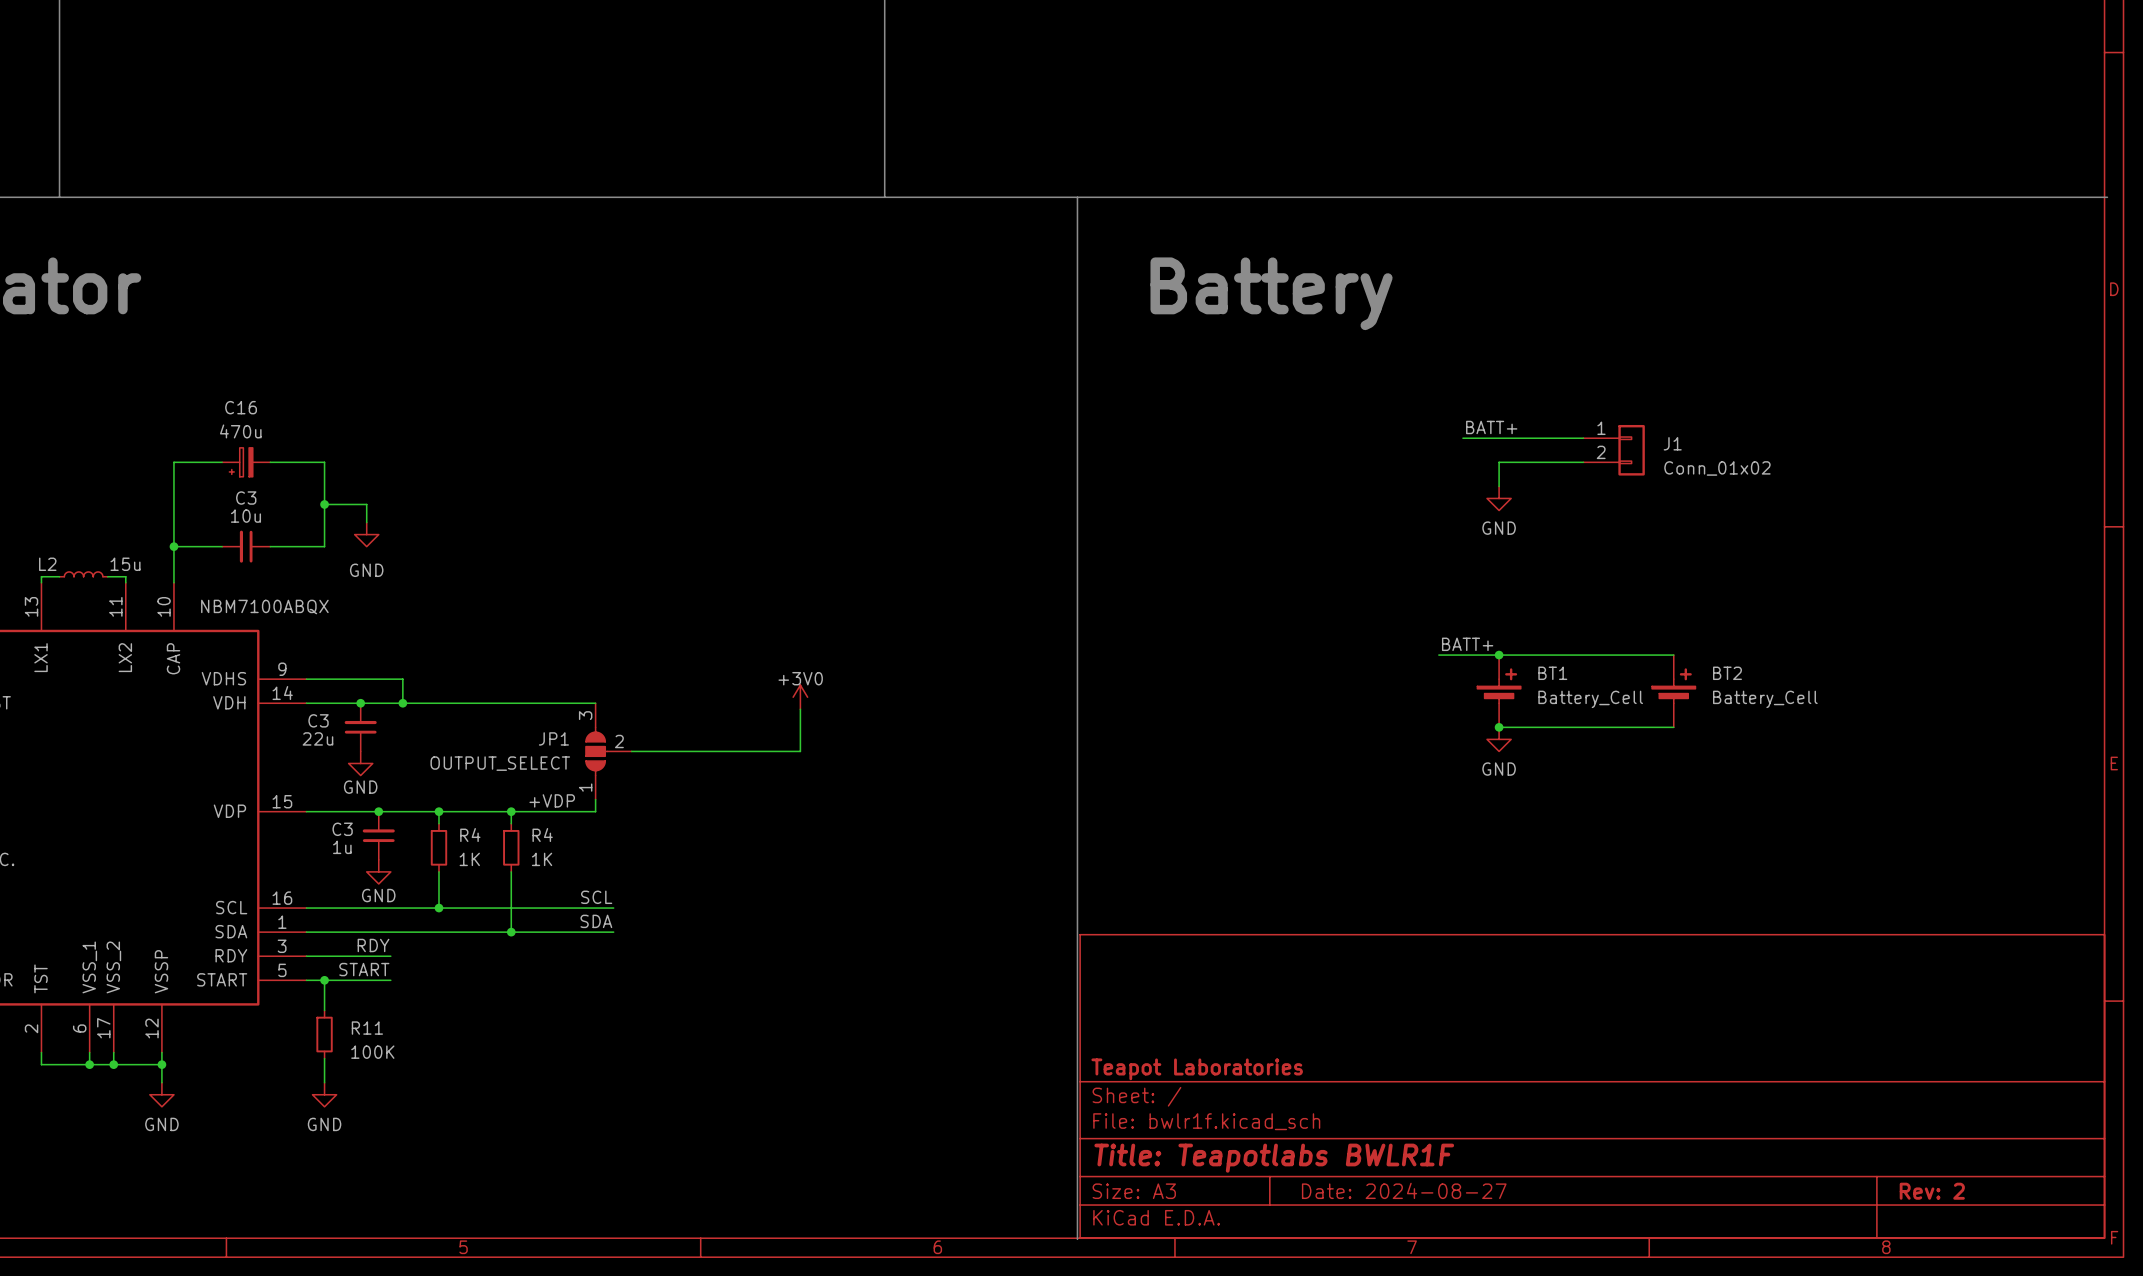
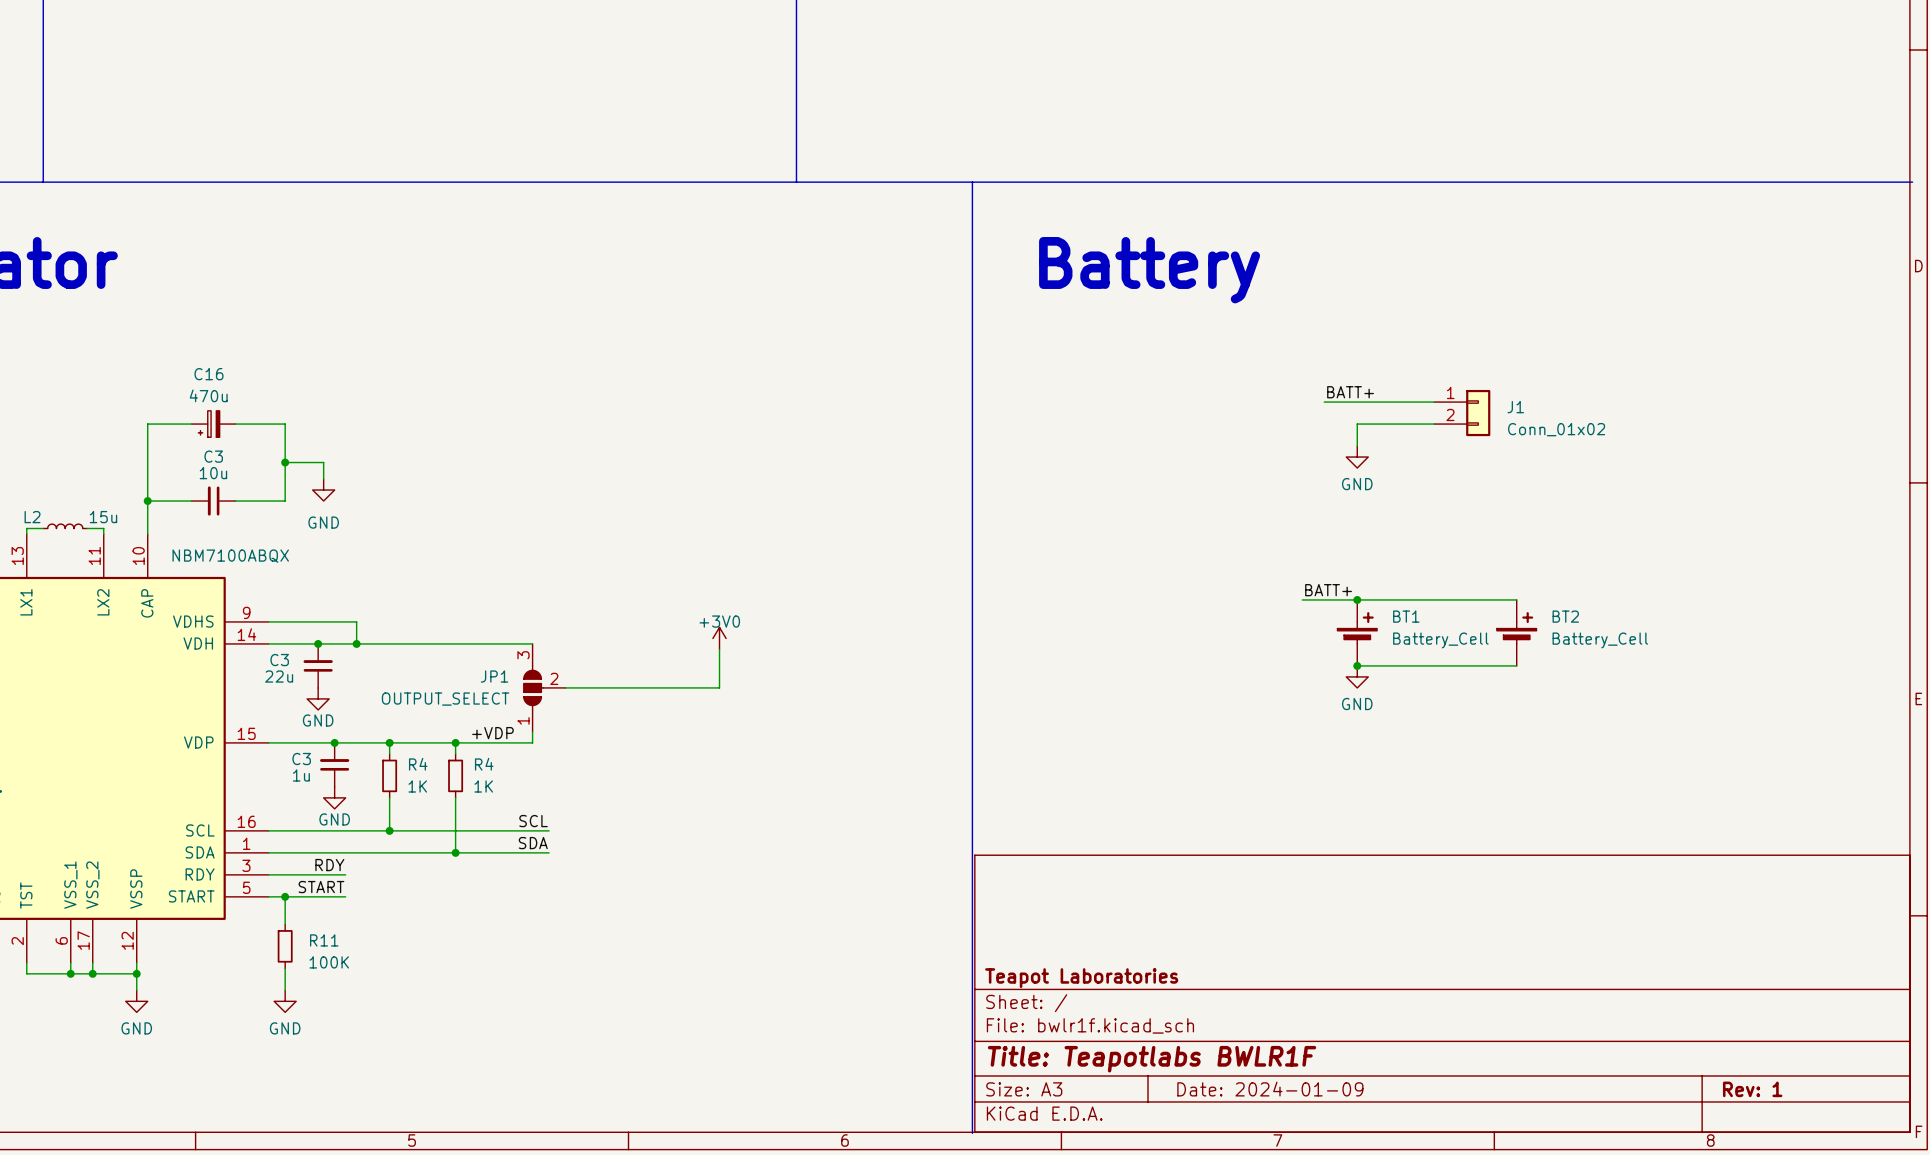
title block: Date: 2024-08-27 (1404, 1190) -> Date: 2024-01-09 (1270, 1089)
title block: Rev: 2 (1932, 1191) -> Rev: 1 (1752, 1089)

